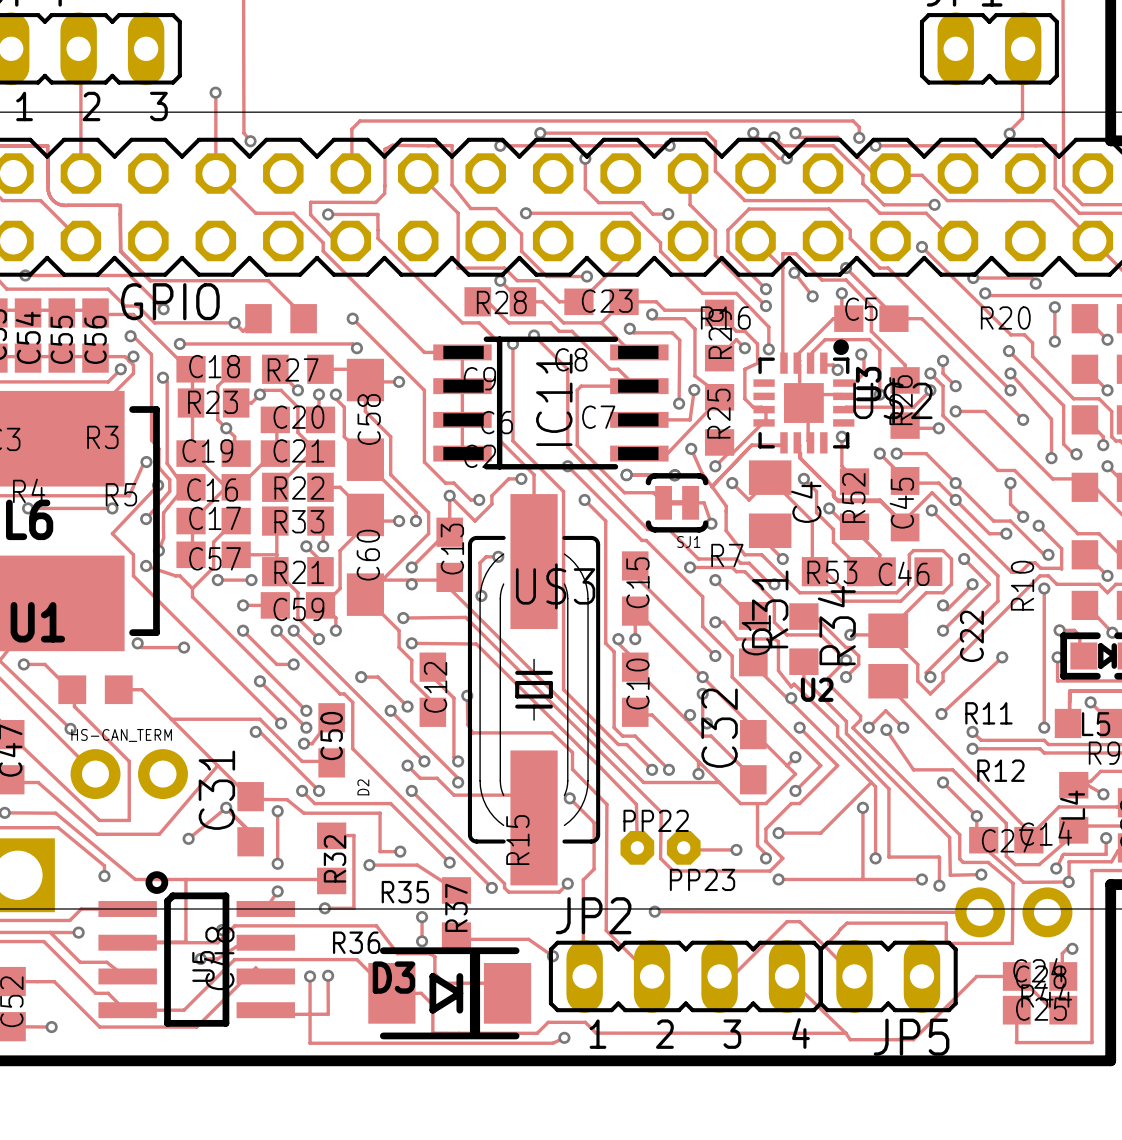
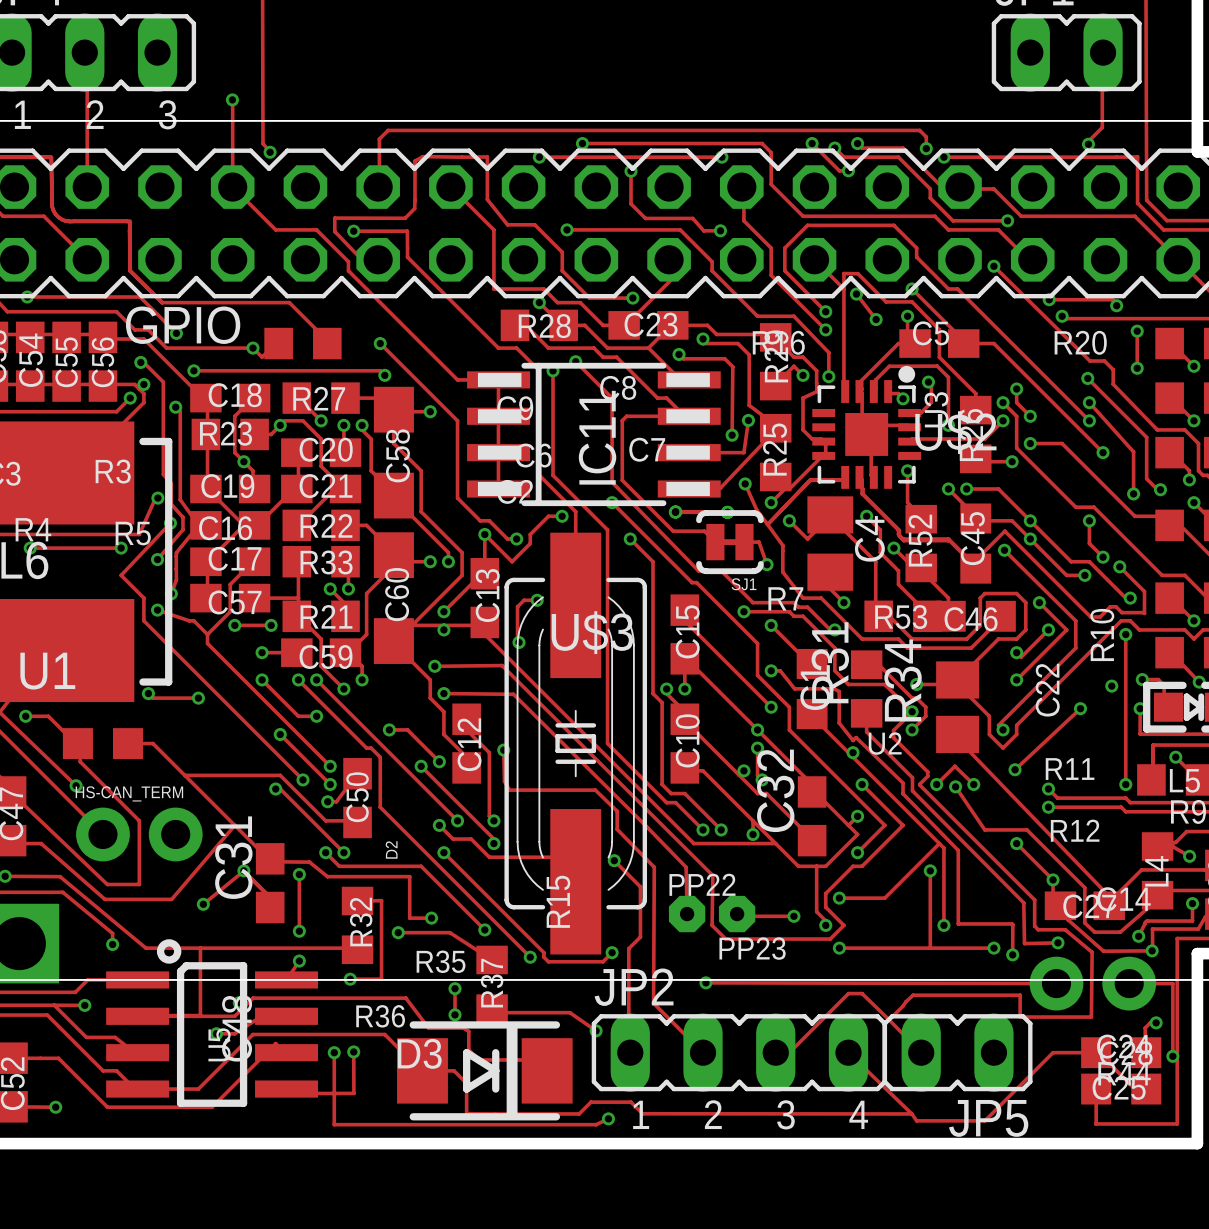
via: none -> (1111, 686)
track: none -> (1129, 983) (1172, 983) (1172, 1056)
via: none -> (1172, 1056)

